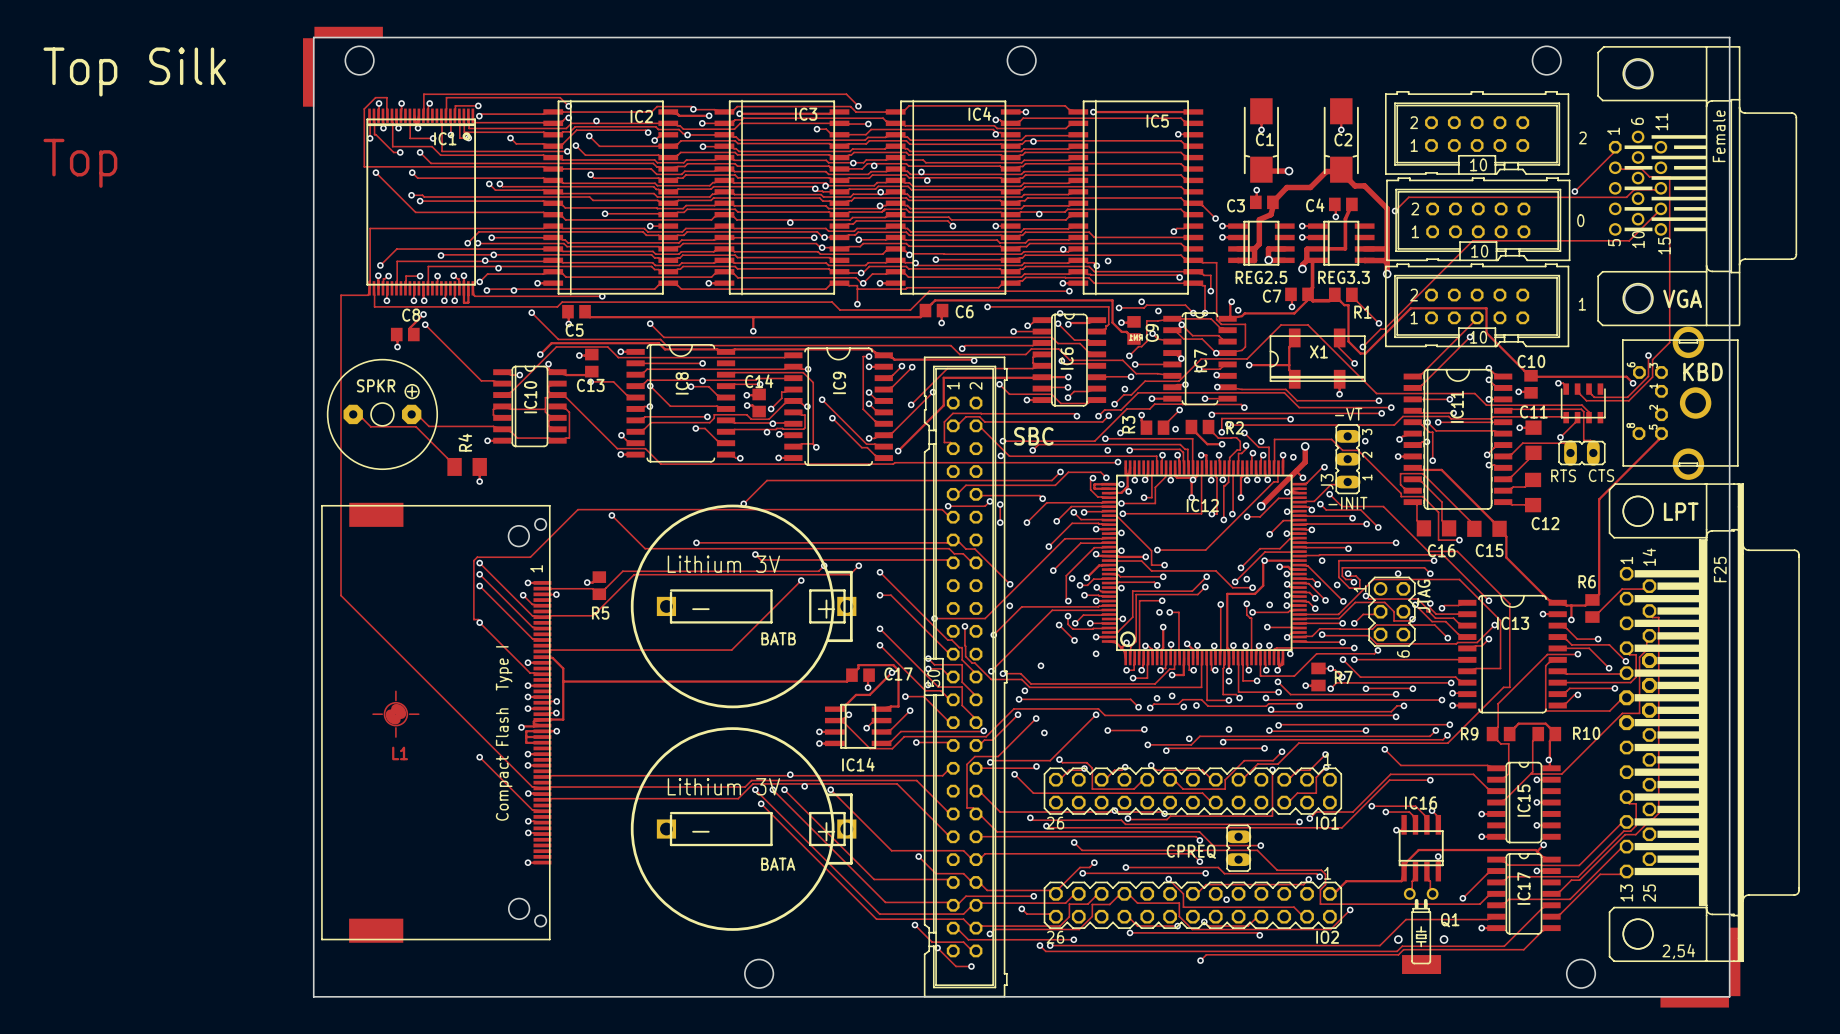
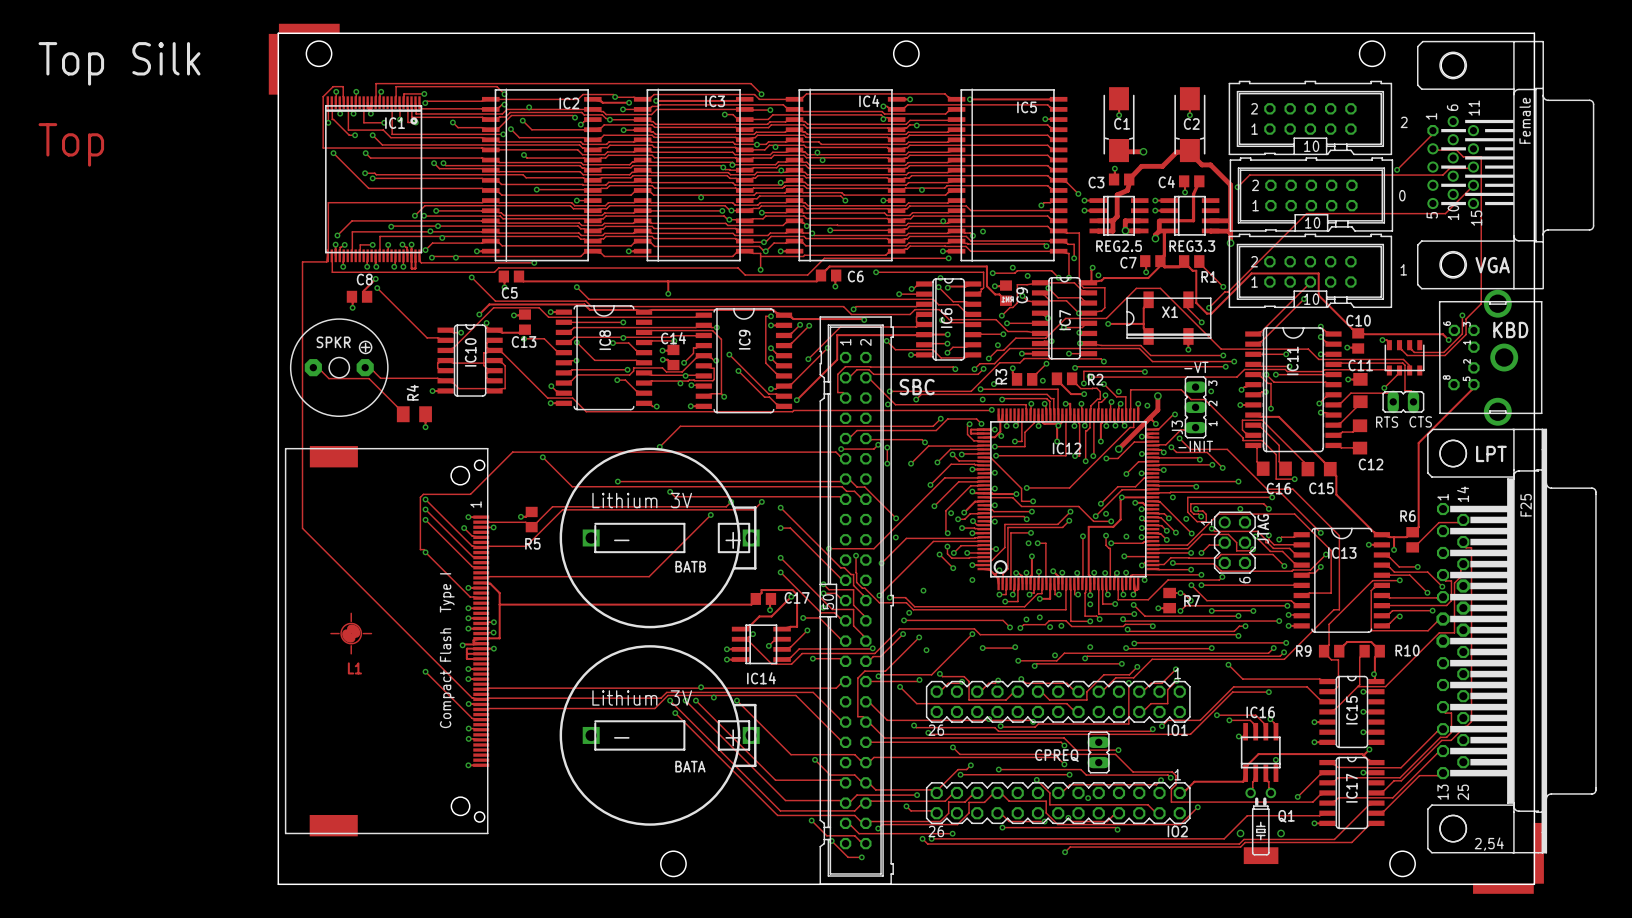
IC7 footprint: [1163, 312, 1237, 406] -> [1031, 277, 1098, 360]

